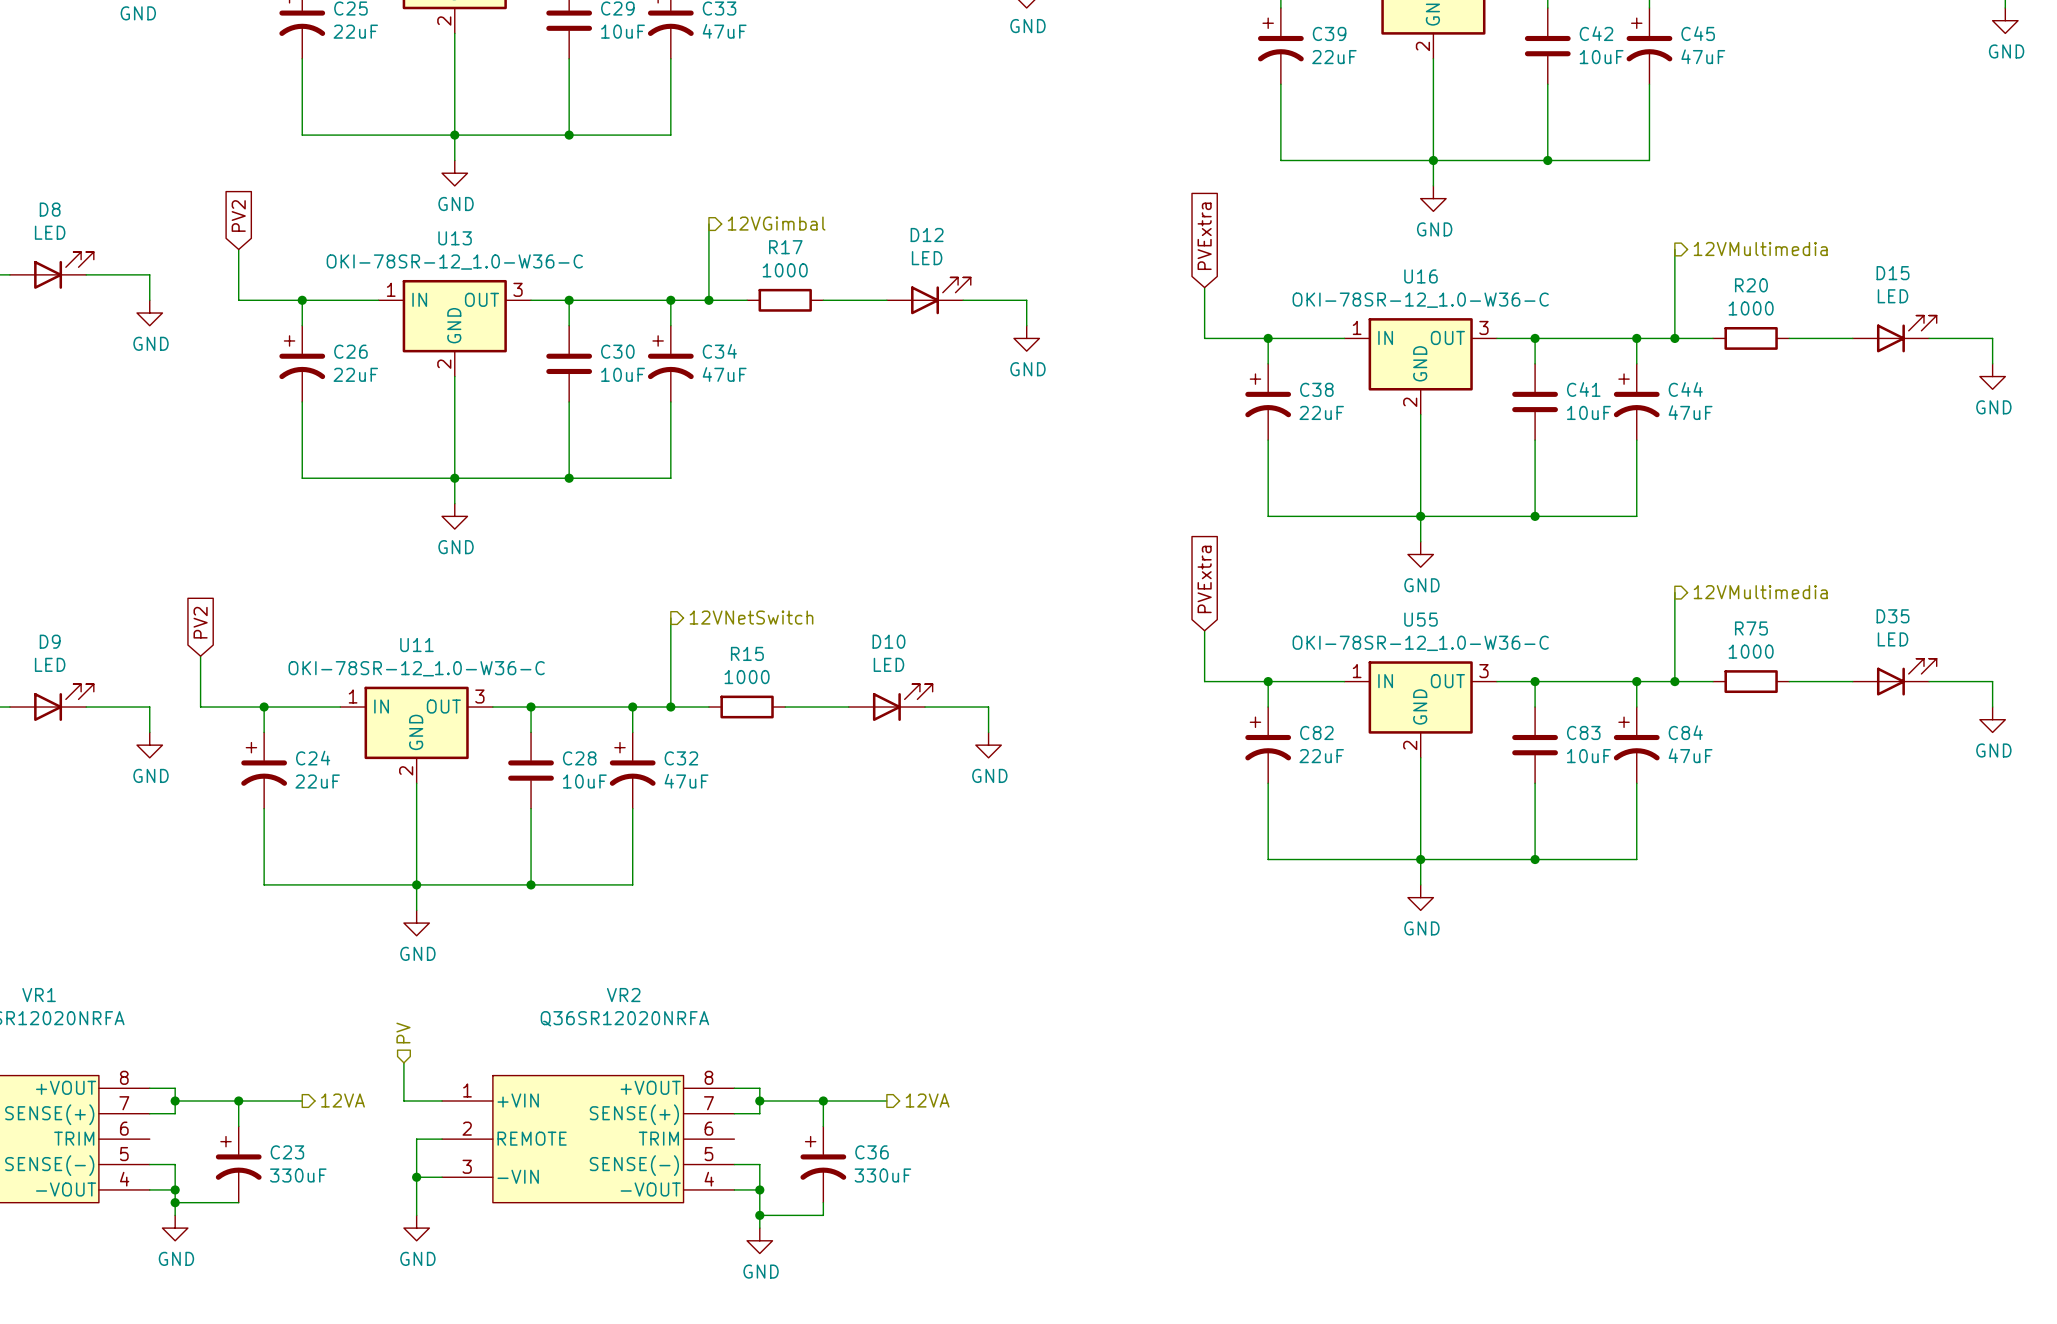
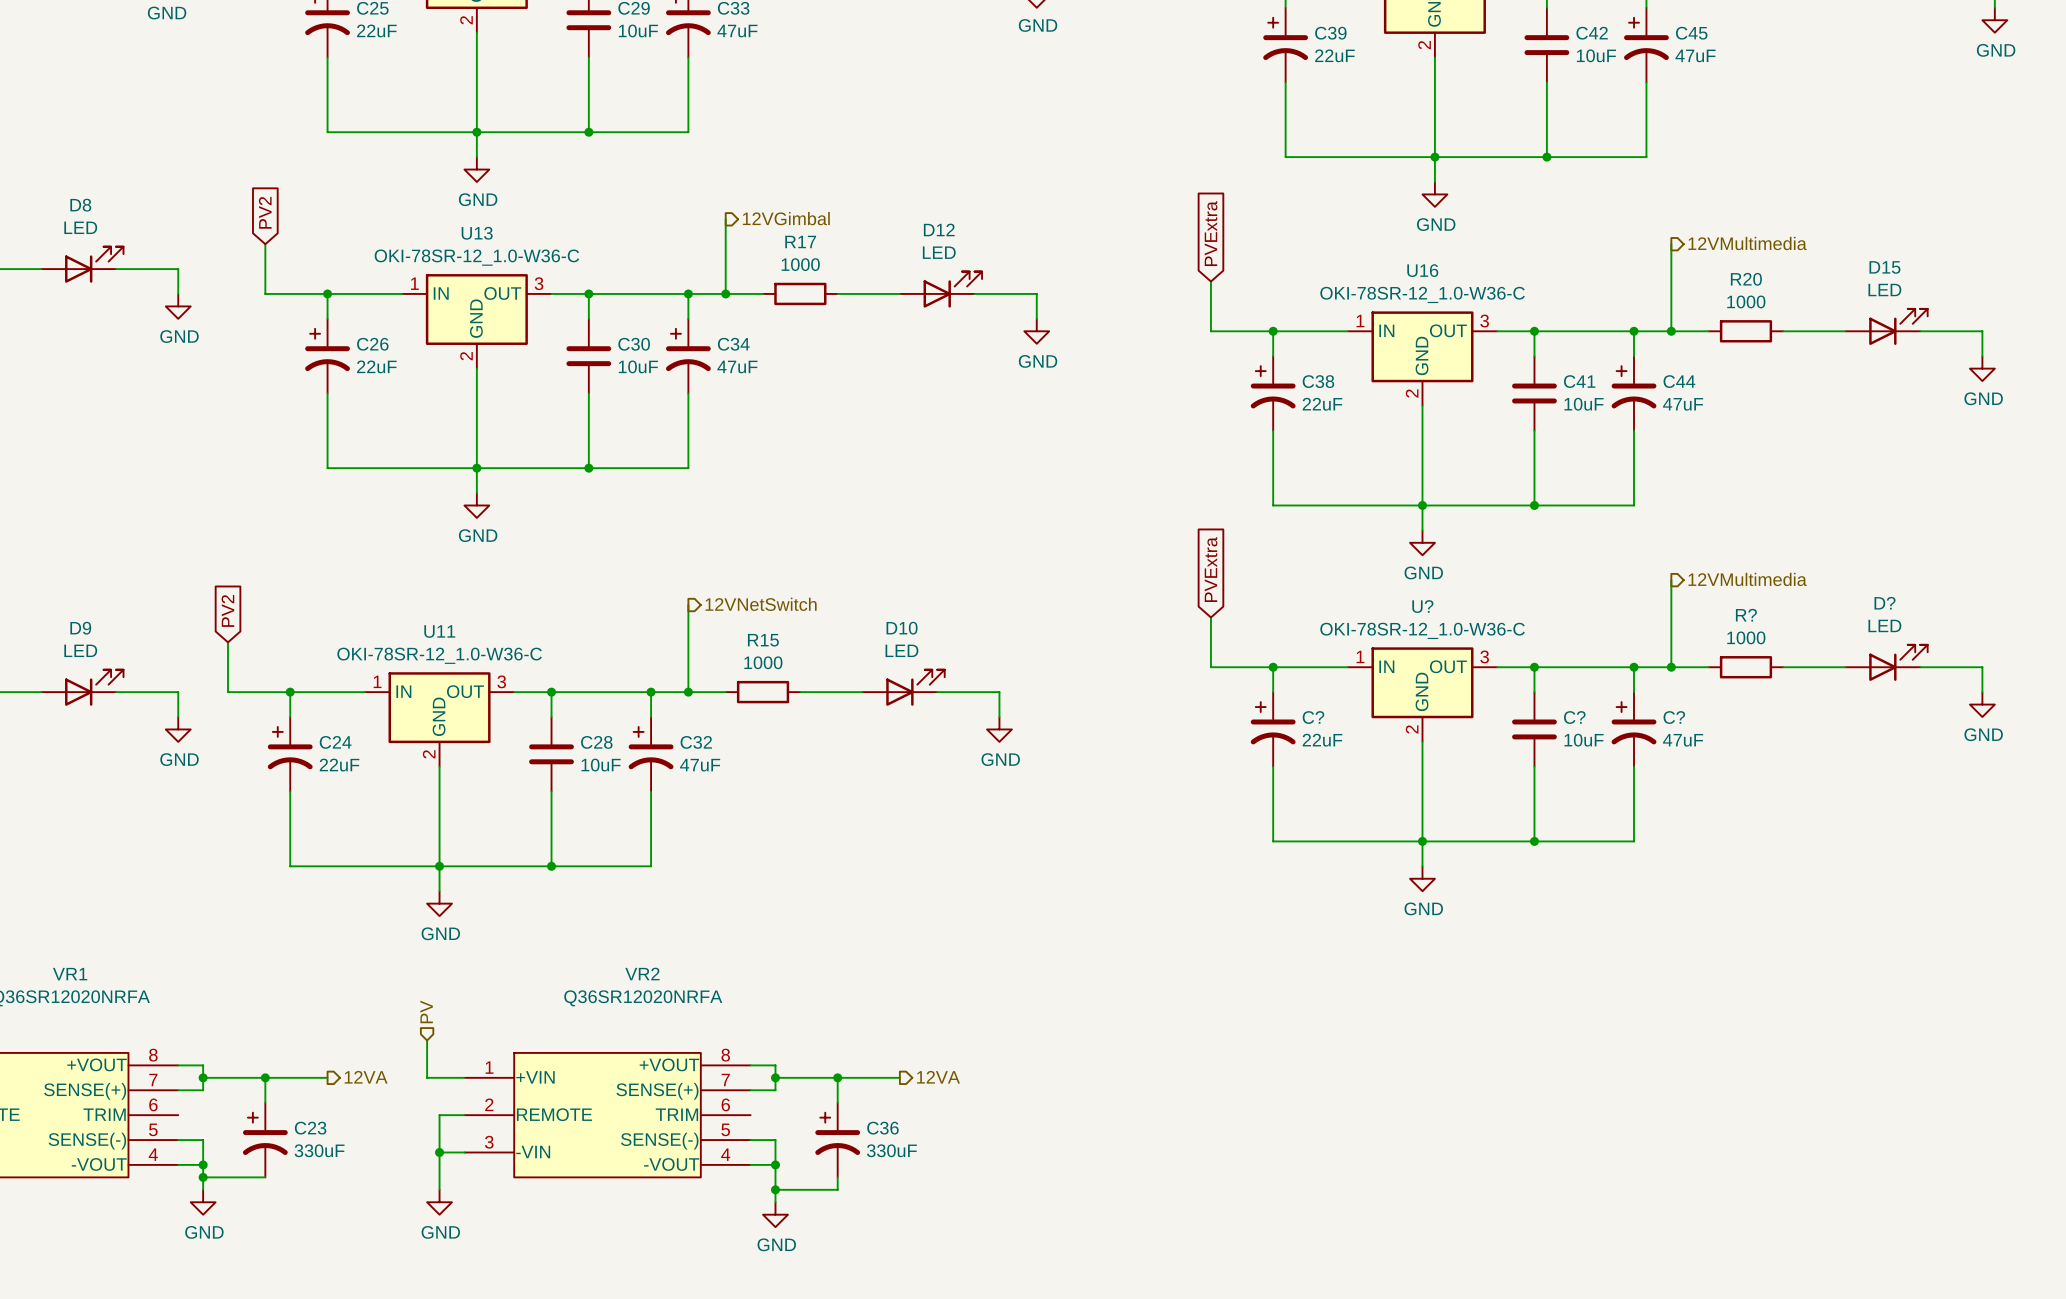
D35 name: D35 (1893, 616) -> D? (1885, 603)
U55 name: U55 (1420, 619) -> U? (1422, 606)
R75 name: R75 (1751, 628) -> R? (1746, 615)
C82 name: C82 (1316, 732) -> C? (1313, 717)
C83 name: C83 (1583, 732) -> C? (1574, 717)
C84 name: C84 (1685, 732) -> C? (1674, 717)

